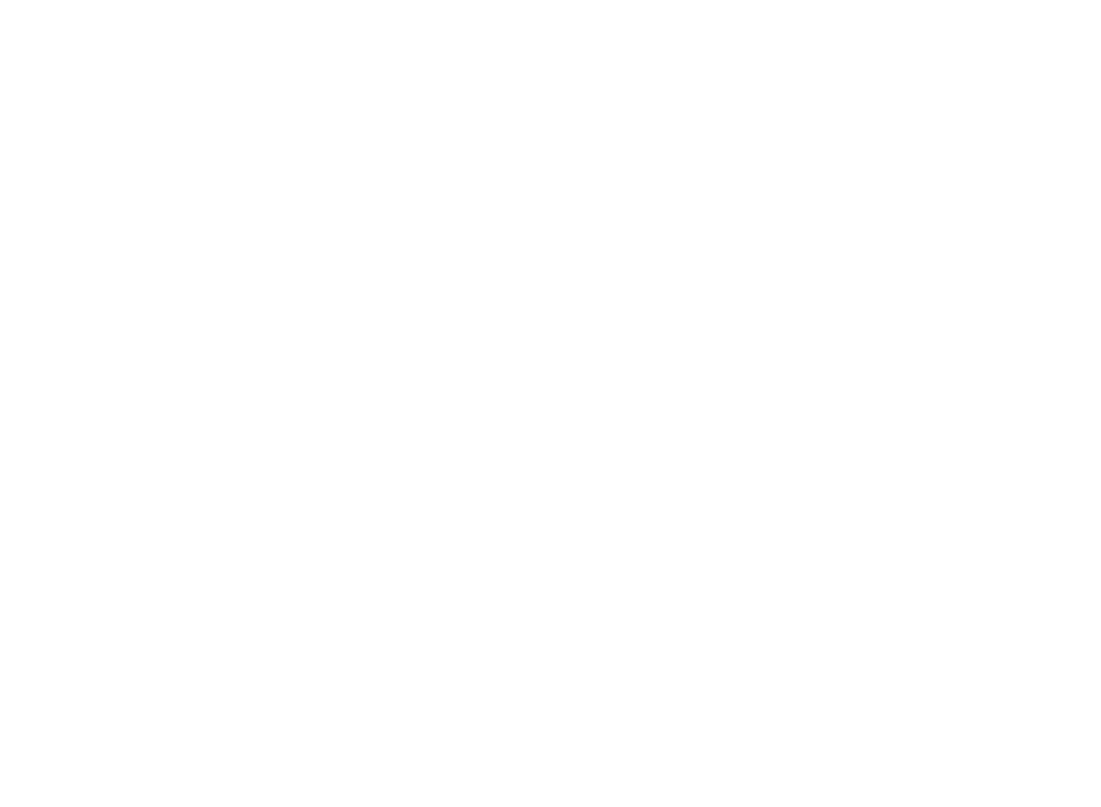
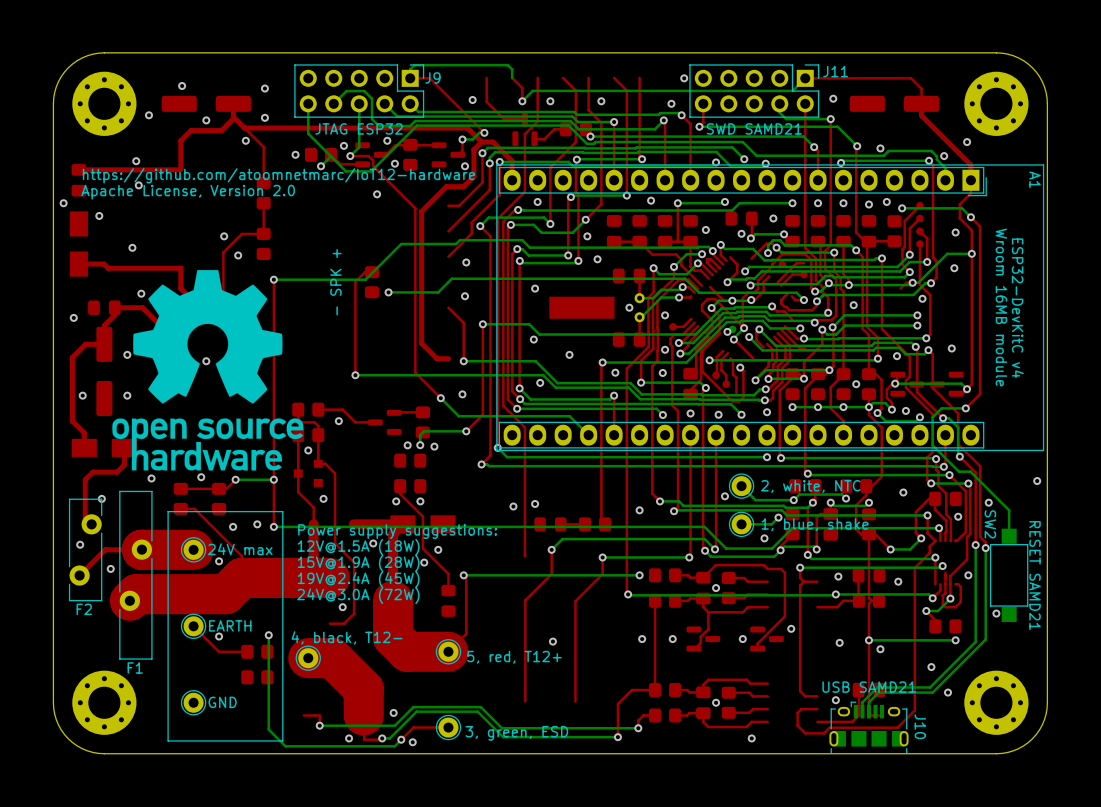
board edge: none -> (996, 52) (104, 52) (87, 55) (72, 63) (58, 81) (53, 103) (53, 702) (56, 719) (64, 734) (82, 748) (104, 753) (996, 753) (1013, 750) (1028, 742) (1042, 724) (1047, 702) (1047, 103) (1042, 81) (1032, 67) (1013, 55) (996, 52)
top track: none -> (486, 77) (486, 101) (503, 119) (524, 119)
top track: none -> (512, 77) (522, 88) (522, 101)
bottom track: none -> (512, 77) (512, 69) (507, 65) (414, 65) (410, 69) (410, 78)
top track: none -> (537, 77) (537, 121) (524, 134) (524, 191) (497, 218) (497, 447)
top track: none -> (563, 77) (575, 90) (575, 142) (550, 167) (550, 223)
top track: none -> (588, 77) (588, 110) (601, 122) (601, 204) (585, 219)
top track: none -> (614, 77) (626, 90) (626, 195)
top track: none -> (639, 77) (639, 156) (642, 159)
top track: none -> (410, 78) (429, 78) (484, 132)
via: none -> (684, 78)
top track: none -> (805, 78) (911, 78) (921, 88) (921, 115) (970, 164) (970, 193) (959, 204) (959, 218) (971, 230) (971, 384) (962, 393) (956, 393)
bottom track: none -> (805, 78) (792, 90) (532, 90) (522, 101)
via: none -> (182, 85)
via: none -> (264, 88)
J9: none -> (359, 91)
J11: none -> (754, 91)
via: none -> (833, 98)
via: none -> (472, 100)
via: none -> (522, 101)
via: none -> (550, 101)
via: none -> (601, 101)
part: none -> (104, 103)
part: none -> (206, 103)
top track: none -> (233, 103) (233, 118) (221, 130) (191, 130) (180, 140) (179, 169) (78, 169)
bottom track: none -> (308, 103) (308, 133) (345, 171) (371, 171) (417, 125) (568, 125) (587, 143) (595, 142) (742, 142) (756, 155) (883, 155) (888, 150) (931, 150) (945, 168) (945, 180)
bottom track: none -> (333, 103) (346, 91) (364, 91) (371, 98) (371, 119) (378, 126) (410, 126) (415, 121) (570, 121) (578, 129) (654, 129) (663, 120)
bottom track: none -> (359, 103) (359, 147) (350, 156)
bottom track: none -> (384, 103) (397, 116) (572, 116) (577, 122) (614, 122)
bottom track: none -> (410, 103) (418, 112) (574, 112) (577, 114) (679, 113) (681, 115)
via: none -> (671, 103)
top track: none -> (703, 103) (703, 122) (699, 126)
bottom track: none -> (779, 103) (779, 112) (786, 119) (830, 119)
top track: none -> (805, 103) (805, 247) (815, 258) (815, 280) (822, 287) (822, 292) (828, 297) (828, 312)
part: none -> (894, 103)
part: none -> (996, 103)
top track: none -> (240, 105) (234, 111) (234, 117) (263, 147) (263, 182)
via: none -> (148, 115)
top track: none -> (681, 115) (690, 124) (690, 180)
via: none -> (681, 115)
top track: none -> (233, 116) (244, 128) (467, 128) (481, 142)
via: none -> (264, 117)
top track: none -> (830, 119) (830, 245) (824, 251) (824, 268) (836, 279) (836, 315) (831, 320) (817, 320) (814, 322)
via: none -> (830, 119)
via: none -> (206, 120)
top track: none -> (663, 120) (665, 180)
via: none -> (663, 120)
top track: none -> (614, 122) (614, 180)
via: none -> (614, 122)
bottom track: none -> (699, 126) (837, 126) (857, 146)
via: none -> (699, 126)
text: none -> JTAG ESP32 (359, 128)
text: none -> SWD SAMD21 (754, 128)
part: none -> (524, 129)
top track: none -> (565, 129) (554, 129) (544, 139) (534, 139)
part: none -> (575, 129)
bottom track: none -> (484, 132) (479, 132) (472, 139) (462, 139)
via: none -> (484, 132)
bottom track: none -> (590, 136) (803, 136) (814, 147)
via: none -> (590, 136)
top track: none -> (462, 139) (462, 150) (458, 154)
via: none -> (462, 139)
via: none -> (245, 140)
via: none -> (387, 140)
top track: none -> (481, 142) (473, 149) (473, 176) (463, 186) (446, 186) (421, 211) (421, 343) (436, 358) (448, 358)
top track: none -> (481, 142) (493, 142) (512, 161) (512, 180)
via: none -> (967, 142)
via: none -> (343, 145)
top track: none -> (438, 145) (395, 145) (386, 154) (382, 154)
top track: none -> (857, 146) (856, 232) (865, 241) (868, 241)
via: none -> (857, 146)
top track: none -> (814, 147) (818, 150) (818, 180)
via: none -> (814, 147)
via: none -> (880, 148)
top track: none -> (482, 153) (482, 182) (459, 205) (448, 205)
bottom track: none -> (482, 153) (487, 147) (732, 147) (744, 159)
via: none -> (482, 153)
via: none -> (295, 154)
part: none -> (321, 154)
top track: none -> (331, 154) (340, 164) (361, 164)
part: none -> (371, 154)
part: none -> (410, 154)
part: none -> (448, 154)
bottom track: none -> (330, 156) (321, 166)
top track: none -> (350, 156) (368, 156) (373, 160) (373, 166) (415, 208) (415, 372) (440, 398)
via: none -> (350, 156)
via: none -> (944, 156)
top track: none -> (576, 159) (578, 260)
via: none -> (576, 159)
bottom track: none -> (642, 159) (576, 159)
via: none -> (642, 159)
via: none -> (744, 159)
top track: none -> (929, 160) (933, 164) (933, 257) (936, 260) (936, 277) (931, 283)
bottom track: none -> (929, 160) (843, 160) (841, 162)
via: none -> (929, 160)
via: none -> (136, 161)
top track: none -> (499, 161) (499, 194) (471, 222) (471, 233) (448, 256)
bottom track: none -> (499, 161) (568, 161) (573, 166) (712, 166) (716, 162)
via: none -> (499, 161)
via: none -> (716, 162)
via: none -> (841, 162)
via: none -> (394, 163)
top track: none -> (489, 163) (489, 189) (448, 231)
bottom track: none -> (489, 163) (489, 157) (495, 152) (716, 151) (730, 166) (762, 166) (765, 163)
via: none -> (489, 163)
via: none -> (765, 163)
via: none -> (321, 166)
via: none -> (465, 166)
text: none -> https://github.com/atoomnetmarc/IoT12-hardware (278, 175)
part: none -> (78, 180)
via: none -> (138, 185)
text: none -> Apache License, Version 2.0 (188, 192)
part: none -> (263, 193)
via: none -> (377, 194)
bottom track: none -> (626, 195) (570, 197)
via: none -> (626, 195)
top track: none -> (570, 197) (568, 199) (568, 255)
via: none -> (570, 197)
via: none -> (651, 200)
via: none -> (537, 201)
bottom track: none -> (724, 201) (677, 203)
via: none -> (724, 201)
via: none -> (886, 201)
via: none -> (63, 203)
top track: none -> (263, 203) (263, 233) (241, 233) (223, 252) (223, 326)
top track: none -> (677, 203) (678, 241)
via: none -> (677, 203)
bottom track: none -> (792, 203) (739, 203) (732, 210) (518, 209)
via: none -> (792, 203)
via: none -> (818, 203)
via: none -> (843, 203)
via: none -> (868, 204)
top track: none -> (919, 205) (904, 220) (902, 264) (909, 272)
part: none -> (919, 205)
bottom track: none -> (902, 208) (962, 208) (970, 217)
via: none -> (902, 208)
top track: none -> (518, 209) (515, 209) (503, 221) (503, 405) (524, 427) (525, 556)
via: none -> (518, 209)
via: none -> (99, 215)
top track: none -> (970, 217) (980, 226) (980, 394) (965, 408)
via: none -> (970, 217)
part: none -> (741, 218)
top track: none -> (751, 218) (750, 238)
via: none -> (773, 218)
top track: none -> (919, 218) (909, 228) (909, 254)
part: none -> (919, 218)
bottom track: none -> (585, 219) (572, 232) (541, 232) (533, 224) (510, 224)
via: none -> (585, 219)
bottom track: none -> (550, 223) (544, 217) (488, 217) (480, 226)
via: none -> (550, 223)
top track: none -> (510, 224) (507, 227) (507, 399) (517, 408)
via: none -> (510, 224)
top track: none -> (480, 226) (490, 236) (490, 455) (481, 464)
via: none -> (480, 226)
via: none -> (705, 229)
part: none -> (614, 231)
part: none -> (639, 231)
part: none -> (665, 231)
part: none -> (690, 231)
part: none -> (792, 231)
part: none -> (818, 231)
part: none -> (843, 231)
part: none -> (868, 231)
part: none -> (894, 231)
top track: none -> (919, 231) (927, 238) (927, 262)
part: none -> (919, 231)
via: none -> (955, 232)
via: none -> (741, 233)
bottom track: none -> (784, 234) (755, 234) (750, 238)
via: none -> (784, 234)
via: none -> (224, 236)
via: none -> (587, 236)
via: none -> (750, 238)
top track: none -> (614, 241) (639, 241) (652, 254) (676, 254) (681, 259) (681, 265) (701, 285)
top track: none -> (665, 241) (690, 241) (690, 266) (694, 270) (700, 270) (708, 278)
top track: none -> (818, 241) (820, 244) (820, 274) (828, 283)
top track: none -> (843, 241) (843, 274) (848, 279) (848, 285)
top track: none -> (894, 241) (869, 241) (867, 243) (867, 326) (877, 337) (877, 358)
part: none -> (78, 244)
part: none -> (263, 244)
top track: none -> (720, 244) (720, 255) (726, 260)
bottom track: none -> (720, 244) (724, 248) (753, 248) (764, 260) (881, 258)
via: none -> (720, 244)
top track: none -> (919, 244) (919, 284) (930, 295) (930, 334) (926, 338)
part: none -> (919, 244)
via: none -> (132, 247)
top track: none -> (776, 247) (772, 243) (766, 243) (751, 258)
bottom track: none -> (776, 247) (781, 252) (834, 252)
via: none -> (776, 247)
top track: none -> (517, 249) (512, 253) (512, 391) (520, 399)
bottom track: none -> (517, 249) (522, 249) (528, 255) (568, 255)
via: none -> (517, 249)
top track: none -> (856, 250) (862, 256) (862, 328) (868, 335) (868, 374) (876, 374) (881, 379) (881, 409) (877, 413)
bottom track: none -> (856, 250) (851, 245) (784, 245) (780, 240) (773, 240) (768, 245) (768, 253)
via: none -> (856, 250)
top track: none -> (712, 251) (712, 254) (723, 264)
bottom track: none -> (712, 251) (708, 246) (529, 247) (522, 240) (459, 240) (456, 244) (401, 244) (365, 279) (273, 279)
via: none -> (712, 251)
top track: none -> (834, 252) (834, 271) (840, 277) (840, 288) (843, 291) (843, 374) (830, 387) (830, 408) (843, 421) (843, 435)
via: none -> (834, 252)
via: none -> (768, 253)
bottom track: none -> (971, 253) (947, 253) (918, 282) (912, 282) (910, 285) (830, 285) (828, 283) (820, 291) (815, 291)
via: none -> (971, 253)
bottom track: none -> (702, 254) (686, 254) (674, 266)
via: none -> (702, 254)
bottom track: none -> (909, 254) (897, 266) (749, 266) (745, 271)
via: none -> (909, 254)
via: none -> (238, 255)
via: none -> (568, 255)
top track: none -> (730, 257) (737, 264) (737, 272) (727, 282)
top track: none -> (881, 258) (881, 329) (909, 356) (909, 376) (905, 380) (905, 387) (932, 414) (932, 451) (927, 457) (927, 479) (931, 483)
via: none -> (881, 258)
via: none -> (597, 259)
top track: none -> (519, 260) (519, 388)
via: none -> (519, 260)
bottom track: none -> (578, 260) (576, 263) (521, 263) (519, 260)
via: none -> (578, 260)
via: none -> (466, 262)
bottom track: none -> (927, 262) (909, 262) (900, 271) (761, 271) (754, 278) (730, 279) (727, 282)
via: none -> (927, 262)
top track: none -> (697, 263) (700, 263) (712, 275)
bottom track: none -> (697, 263) (687, 274) (659, 274) (653, 268)
via: none -> (697, 263)
top track: none -> (803, 263) (796, 263) (777, 282)
top track: none -> (78, 264) (104, 264) (108, 268) (180, 268) (180, 288) (189, 297) (189, 326)
part: none -> (782, 264)
top track: none -> (674, 266) (674, 278) (652, 299) (653, 348) (641, 360) (641, 382)
via: none -> (674, 266)
top track: none -> (719, 267) (710, 259) (707, 259) (707, 262) (716, 271)
top track: none -> (653, 268) (653, 292) (648, 297) (648, 346) (626, 368) (628, 594)
via: none -> (653, 268)
via: none -> (954, 268)
drawing: none -> [112, 270, 304, 471]
via: none -> (745, 271)
top track: none -> (371, 272) (364, 272) (355, 281) (355, 375)
bottom track: none -> (909, 272) (904, 277) (825, 275) (817, 284) (750, 285)
via: none -> (909, 272)
top track: none -> (803, 274) (792, 274) (781, 285)
part: none -> (803, 274)
part: none -> (629, 275)
top track: none -> (639, 275) (639, 298)
top track: none -> (769, 276) (763, 282) (763, 291) (754, 300) (751, 300)
top track: none -> (273, 279) (273, 526)
via: none -> (273, 279)
text: none -> - SPK + (335, 282)
part: none -> (371, 282)
via: none -> (727, 282)
top track: none -> (912, 282) (906, 282) (900, 288)
via: none -> (912, 282)
via: none -> (828, 283)
bottom track: none -> (931, 283) (925, 283) (913, 294) (823, 294) (816, 301)
via: none -> (931, 283)
via: none -> (750, 285)
via: none -> (848, 285)
top track: none -> (682, 287) (689, 287) (694, 292)
bottom track: none -> (682, 287) (679, 289) (661, 289) (652, 298) (639, 298)
via: none -> (682, 287)
top track: none -> (710, 287) (723, 300) (732, 300)
via: none -> (535, 288)
top track: none -> (698, 289) (688, 279) (679, 279) (657, 301) (657, 361) (652, 366) (652, 493) (659, 501)
top track: none -> (815, 291) (811, 287) (811, 260) (805, 254) (782, 254) (757, 280) (757, 289) (754, 292) (748, 292) (742, 298) (742, 326)
via: none -> (815, 291)
bottom track: none -> (388, 292) (438, 292) (451, 278) (685, 278) (699, 292) (796, 292) (803, 300)
via: none -> (388, 292)
top track: none -> (788, 292) (781, 299) (781, 303) (789, 310) (812, 310) (816, 305) (816, 301)
via: none -> (141, 293)
via: none -> (465, 296)
top track: none -> (691, 296) (679, 297)
top track: none -> (791, 296) (795, 300) (803, 300)
bottom track: none -> (679, 297) (661, 297) (639, 317)
via: none -> (679, 297)
via: none -> (922, 298)
via: none -> (732, 300)
bottom track: none -> (751, 300) (718, 300) (711, 308)
via: none -> (751, 300)
via: none -> (803, 300)
via: none -> (816, 301)
via: none -> (853, 305)
top track: none -> (772, 306) (777, 311) (784, 311) (791, 319)
bottom track: none -> (772, 306) (721, 308) (695, 334) (539, 334) (529, 324) (482, 324)
via: none -> (772, 306)
part: none -> (104, 307)
top track: none -> (448, 307) (463, 323) (463, 361)
part: none -> (596, 307)
via: none -> (629, 307)
A1: none -> (770, 307)
text: none -> Wroom 16MB module (1001, 307)
text: none -> ESP32-DevKitC v4 (1017, 308)
top track: none -> (711, 308) (719, 315) (719, 333) (701, 351) (701, 379) (690, 390) (690, 394)
via: none -> (711, 308)
bottom track: none -> (828, 312) (825, 315) (769, 315) (766, 311) (723, 313) (693, 342) (678, 342)
via: none -> (828, 312)
via: none -> (665, 315)
bottom track: none -> (917, 315) (844, 315) (832, 327)
via: none -> (917, 315)
via: none -> (73, 317)
top track: none -> (639, 317) (639, 339)
top track: none -> (691, 319) (683, 326) (672, 326)
top track: none -> (694, 322) (682, 334) (674, 334) (670, 338) (672, 346) (672, 405) (678, 411) (678, 507) (674, 511)
bottom track: none -> (814, 322) (812, 320) (769, 320) (764, 316) (725, 317) (689, 353) (680, 353)
via: none -> (814, 322)
top track: none -> (482, 324) (482, 414) (466, 431)
via: none -> (482, 324)
bottom track: none -> (917, 325) (845, 325) (836, 334) (827, 334) (822, 329)
via: none -> (917, 325)
top track: none -> (172, 326) (161, 326) (142, 307) (114, 307) (114, 315) (104, 325) (104, 344) (85, 344) (72, 357) (72, 421) (84, 432) (84, 447)
part: none -> (672, 326)
top track: none -> (698, 326) (681, 342) (678, 342)
top track: none -> (784, 326) (797, 338) (803, 338)
top track: none -> (832, 327) (833, 366) (825, 374) (818, 374) (805, 388) (805, 471) (807, 473)
via: none -> (832, 327)
top track: none -> (744, 328) (715, 299) (707, 299) (702, 304) (702, 310) (712, 320) (712, 326) (705, 333)
bottom track: none -> (744, 328) (733, 339)
via: none -> (744, 328)
bottom track: none -> (800, 328) (770, 328) (762, 320) (726, 322) (686, 362) (602, 362)
via: none -> (800, 328)
top track: none -> (701, 329) (680, 353)
part: none -> (732, 329)
top track: none -> (759, 329) (756, 332) (756, 340) (763, 347)
bottom track: none -> (759, 329) (775, 345) (871, 345) (874, 342) (911, 342) (915, 346)
via: none -> (759, 329)
top track: none -> (781, 329) (800, 348) (805, 348)
top track: none -> (822, 329) (822, 344) (803, 362) (803, 378) (799, 374) (792, 374) (792, 378) (779, 390) (781, 458)
via: none -> (822, 329)
via: none -> (727, 331)
top track: none -> (719, 333) (702, 350) (702, 371) (732, 401) (739, 401) (743, 397) (743, 370) (740, 367)
top track: none -> (777, 333) (789, 345) (789, 360) (782, 368) (782, 381) (773, 391) (773, 397) (770, 400) (764, 400)
top track: none -> (708, 336) (696, 349) (696, 368) (690, 373)
top track: none -> (774, 336) (785, 348) (785, 358) (777, 366) (777, 380) (768, 389) (765, 389)
bottom track: none -> (749, 337) (762, 350) (873, 350) (876, 347) (899, 347) (905, 354) (924, 354) (928, 350)
via: none -> (749, 337)
via: none -> (803, 338)
bottom track: none -> (926, 338) (803, 338)
via: none -> (926, 338)
via: none -> (533, 339)
part: none -> (629, 339)
top track: none -> (733, 339) (752, 358)
via: none -> (733, 339)
top track: none -> (770, 340) (776, 346) (776, 360) (773, 364) (773, 370) (767, 376)
via: none -> (678, 342)
top track: none -> (767, 343) (772, 349) (772, 359) (755, 380)
top track: none -> (915, 346) (917, 392) (943, 418)
via: none -> (915, 346)
via: none -> (951, 348)
via: none -> (665, 349)
top track: none -> (928, 350) (932, 354) (932, 387) (958, 413) (958, 444) (980, 466) (980, 536) (985, 542) (985, 548)
via: none -> (928, 350)
top track: none -> (723, 351) (716, 357) (716, 375)
via: none -> (680, 353)
top track: none -> (727, 353) (721, 359) (721, 370) (726, 375) (726, 384)
via: none -> (127, 354)
via: none -> (569, 354)
via: none -> (897, 356)
top track: none -> (730, 358) (732, 360) (732, 374) (736, 377) (736, 394)
bottom track: none -> (877, 358) (876, 360) (709, 360)
via: none -> (877, 358)
via: none -> (709, 360)
via: none -> (206, 361)
bottom track: none -> (463, 361) (535, 361) (557, 383) (630, 383) (641, 394) (754, 395) (760, 389) (765, 389)
via: none -> (463, 361)
top track: none -> (602, 362) (601, 520) (605, 524)
via: none -> (602, 362)
via: none -> (740, 367)
bottom track: none -> (829, 370) (765, 370) (755, 380)
via: none -> (829, 370)
part: none -> (104, 371)
via: none -> (615, 372)
via: none -> (662, 372)
top track: none -> (897, 374) (897, 381) (886, 389) (886, 397) (891, 402) (891, 409)
bottom track: none -> (355, 375) (543, 375) (555, 387) (628, 387) (640, 399) (764, 400)
via: none -> (355, 375)
part: none -> (716, 375)
via: none -> (768, 378)
bottom track: none -> (803, 378) (768, 378)
via: none -> (803, 378)
via: none -> (755, 380)
via: none -> (540, 382)
bottom track: none -> (641, 382) (700, 382) (705, 388)
via: none -> (641, 382)
bottom track: none -> (895, 383) (961, 383) (967, 389)
via: none -> (895, 383)
part: none -> (690, 384)
part: none -> (726, 384)
part: none -> (792, 384)
part: none -> (818, 384)
part: none -> (843, 384)
via: none -> (856, 384)
part: none -> (868, 384)
part: none -> (907, 384)
part: none -> (946, 384)
bottom track: none -> (519, 388) (530, 399) (610, 399) (614, 395)
via: none -> (519, 388)
top track: none -> (705, 388) (703, 390) (703, 548) (705, 550)
via: none -> (705, 388)
via: none -> (765, 389)
via: none -> (967, 389)
via: none -> (462, 394)
top track: none -> (868, 394) (868, 414) (881, 427) (881, 476) (872, 486) (866, 486) (866, 495) (856, 505) (856, 529) (861, 534) (875, 534) (890, 549)
via: none -> (82, 395)
via: none -> (127, 395)
top track: none -> (614, 395) (614, 435)
via: none -> (614, 395)
bottom track: none -> (440, 398) (458, 416) (569, 416) (588, 435)
via: none -> (440, 398)
bottom track: none -> (520, 399) (524, 403) (731, 404) (741, 414)
via: none -> (520, 399)
via: none -> (764, 400)
bottom track: none -> (792, 407) (868, 407) (872, 403) (885, 403) (891, 409)
via: none -> (792, 407)
via: none -> (818, 407)
via: none -> (843, 407)
via: none -> (868, 407)
bottom track: none -> (517, 408) (656, 408) (662, 415)
via: none -> (517, 408)
bottom track: none -> (965, 408) (941, 408) (932, 417) (932, 445) (959, 471) (970, 471) (1009, 510) (1009, 536)
via: none -> (965, 408)
top track: none -> (298, 409) (298, 418) (301, 422) (314, 422) (318, 426) (318, 463) (325, 463) (335, 473) (335, 543) (354, 562) (354, 613) (344, 623) (329, 623)
part: none -> (308, 409)
top track: none -> (318, 409) (342, 409) (355, 422) (374, 422)
via: none -> (891, 409)
via: none -> (905, 410)
top track: none -> (422, 412) (394, 412)
via: none -> (767, 412)
via: none -> (690, 413)
bottom track: none -> (877, 413) (885, 421) (915, 421) (919, 417)
via: none -> (877, 413)
via: none -> (718, 414)
via: none -> (741, 414)
via: none -> (662, 415)
via: none -> (919, 417)
bottom track: none -> (943, 418) (948, 418) (958, 427) (958, 455) (959, 456)
via: none -> (943, 418)
via: none -> (338, 421)
part: none -> (384, 422)
part: none -> (422, 422)
bottom track: none -> (466, 431) (424, 431) (420, 435) (420, 445)
via: none -> (466, 431)
top track: none -> (298, 435) (298, 492) (313, 507) (313, 561) (329, 577) (241, 577)
part: none -> (308, 435)
top track: none -> (690, 435) (689, 557)
top track: none -> (716, 435) (715, 549)
top track: none -> (945, 435) (943, 466)
via: none -> (407, 445)
via: none -> (420, 445)
via: none -> (434, 446)
part: none -> (104, 447)
top track: none -> (124, 447) (124, 464) (117, 472) (92, 472) (85, 479) (85, 517) (91, 524)
bottom track: none -> (497, 447) (507, 457) (767, 457)
via: none -> (497, 447)
via: none -> (308, 450)
top track: none -> (959, 456) (975, 472) (975, 545)
via: none -> (959, 456)
via: none -> (767, 457)
bottom track: none -> (781, 458) (936, 459)
via: none -> (781, 458)
top track: none -> (936, 459) (938, 485) (946, 493) (946, 514) (950, 518) (950, 541)
via: none -> (936, 459)
part: none -> (410, 460)
bottom track: none -> (481, 464) (488, 466) (943, 466)
via: none -> (481, 464)
via: none -> (943, 466)
part: none -> (308, 473)
bottom track: none -> (807, 473) (949, 475)
via: none -> (807, 473)
top track: none -> (949, 475) (965, 491) (965, 532) (955, 541)
via: none -> (949, 475)
via: none -> (201, 477)
via: none -> (151, 478)
top track: none -> (235, 479) (226, 488) (180, 488)
via: none -> (235, 479)
bottom track: none -> (273, 479) (235, 479)
via: none -> (273, 479)
via: none -> (1037, 481)
bottom track: none -> (931, 483) (968, 483)
via: none -> (931, 483)
top track: none -> (968, 483) (970, 485) (970, 533) (967, 537) (967, 559) (950, 576) (950, 598)
via: none -> (968, 483)
top track: none -> (400, 486) (400, 493) (422, 516) (422, 548) (448, 574) (448, 590)
part: none -> (410, 486)
bottom track: none -> (741, 486) (755, 500) (793, 500) (799, 494) (842, 494) (846, 498)
part: none -> (741, 486)
text: none -> 2, white, NTC (810, 486)
part: none -> (805, 486)
top track: none -> (815, 486) (815, 500) (807, 507) (807, 554)
part: none -> (856, 486)
via: none -> (903, 492)
via: none -> (724, 496)
via: none -> (101, 498)
part: none -> (180, 498)
part: none -> (219, 498)
via: none -> (323, 498)
via: none -> (846, 498)
part: none -> (945, 498)
via: none -> (793, 500)
via: none -> (396, 501)
via: none -> (420, 501)
bottom track: none -> (659, 501) (679, 501) (683, 505) (783, 505) (785, 507) (807, 507) (812, 502)
via: none -> (659, 501)
via: none -> (812, 502)
top track: none -> (830, 502) (830, 513) (820, 513) (816, 517) (816, 549)
bottom track: none -> (830, 502) (833, 505) (865, 505) (869, 502)
via: none -> (830, 502)
via: none -> (869, 502)
via: none -> (988, 502)
via: none -> (535, 503)
via: none -> (513, 506)
top track: none -> (180, 508) (194, 508) (241, 556) (241, 577)
via: none -> (639, 510)
line: none -> (282, 511) (282, 740) (168, 740) (168, 511) (282, 511)
bottom track: none -> (674, 511) (781, 510) (787, 515) (927, 515)
via: none -> (674, 511)
top track: none -> (927, 515) (927, 533) (935, 541) (929, 546) (929, 552) (914, 567) (914, 710) (897, 727) (829, 727) (824, 733) (805, 733) (797, 725) (797, 712) (801, 709) (817, 709)
via: none -> (927, 515)
via: none -> (958, 516)
bottom track: none -> (778, 517) (771, 524) (741, 524)
via: none -> (778, 517)
via: none -> (257, 524)
top track: none -> (353, 524) (402, 524) (393, 534) (393, 637) (407, 651) (448, 651) (466, 633) (466, 577) (463, 575)
part: none -> (422, 524)
part: none -> (550, 524)
top track: none -> (584, 524) (560, 524)
part: none -> (595, 524)
part: none -> (741, 524)
part: none -> (792, 524)
text: none -> 1, blue, shake (815, 524)
part: none -> (830, 524)
part: none -> (868, 524)
via: none -> (233, 526)
bottom track: none -> (273, 526) (704, 526) (726, 548) (772, 548) (792, 528) (939, 528)
via: none -> (273, 526)
top track: none -> (939, 528) (940, 541)
via: none -> (939, 528)
text: none -> Power supply suggestions: (397, 531)
top track: none -> (792, 534) (780, 546) (780, 550)
top track: none -> (868, 534) (868, 598) (871, 600)
via: none -> (764, 538)
top track: none -> (921, 538) (915, 533) (915, 512) (929, 498) (935, 498) (935, 509) (946, 520) (945, 541)
bottom track: none -> (921, 538) (910, 549) (890, 549)
via: none -> (921, 538)
via: none -> (373, 543)
via: none -> (80, 544)
bottom track: none -> (975, 545) (975, 641) (930, 687) (877, 687) (862, 702) (862, 711)
via: none -> (975, 545)
text: none -> 12V@1.5A (18W) (358, 547)
bottom track: none -> (985, 548) (985, 639) (932, 692) (878, 692) (868, 702) (868, 711)
via: none -> (985, 548)
F2: none -> (85, 549)
top track: none -> (129, 549) (105, 549) (79, 575)
top track: none -> (141, 549) (193, 549)
part: none -> (193, 549)
text: none -> 24V max (240, 549)
via: none -> (438, 549)
top track: none -> (551, 549) (551, 574) (525, 600) (525, 701)
via: none -> (551, 549)
bottom track: none -> (715, 549) (704, 539) (562, 539) (551, 549)
via: none -> (715, 549)
bottom track: none -> (816, 549) (813, 546) (784, 546) (774, 556) (711, 556) (705, 550)
via: none -> (816, 549)
via: none -> (890, 549)
via: none -> (705, 550)
via: none -> (780, 550)
bottom track: none -> (807, 554) (811, 558) (935, 557)
via: none -> (807, 554)
top track: none -> (602, 557) (602, 574) (575, 601) (575, 701)
via: none -> (602, 557)
bottom track: none -> (689, 557) (602, 557)
via: none -> (689, 557)
top track: none -> (935, 557) (935, 584)
via: none -> (935, 557)
via: none -> (219, 561)
via: none -> (424, 562)
text: none -> 15V@1.9A (28W) (358, 563)
bottom track: none -> (942, 566) (941, 567) (800, 567)
via: none -> (942, 566)
top track: none -> (800, 567) (800, 577) (803, 581)
via: none -> (800, 567)
via: none -> (110, 568)
top track: none -> (945, 572) (945, 593) (942, 595) (942, 604) (945, 607) (955, 607) (960, 602) (960, 586) (955, 584)
F1: none -> (135, 575)
via: none -> (463, 575)
bottom track: none -> (639, 575) (463, 575)
via: none -> (639, 575)
part: none -> (665, 575)
top track: none -> (675, 575) (703, 577) (715, 565) (763, 565) (767, 568) (781, 568) (784, 572) (784, 616) (757, 643) (757, 648)
top track: none -> (858, 575) (858, 600) (843, 600) (837, 607) (817, 607)
part: none -> (868, 575)
via: none -> (968, 575)
SW2: none -> (1009, 575)
text: none -> RESET SAMD21 (1035, 575)
via: none -> (838, 576)
top track: none -> (241, 577) (225, 594) (136, 594) (129, 600)
top track: none -> (728, 578) (744, 578) (747, 581) (767, 581)
text: none -> 19V@2.4A (45W) (358, 579)
top track: none -> (803, 581) (800, 585) (800, 691) (805, 696) (817, 696)
top track: none -> (817, 581) (803, 581)
via: none -> (898, 581)
top track: none -> (940, 584) (940, 590) (932, 598)
part: none -> (703, 588)
via: none -> (716, 588)
part: none -> (728, 588)
bottom track: none -> (628, 594) (928, 594) (932, 598)
via: none -> (628, 594)
top track: none -> (767, 594) (747, 594) (744, 598) (728, 598)
via: none -> (835, 594)
text: none -> 24V@3.0A (72W) (358, 595)
via: none -> (932, 598)
bottom track: none -> (950, 598) (938, 611) (926, 611)
via: none -> (950, 598)
part: none -> (448, 600)
top track: none -> (655, 600) (655, 690) (631, 690) (617, 704) (617, 737)
part: none -> (665, 600)
top track: none -> (675, 600) (703, 598) (703, 607) (708, 612)
part: none -> (868, 600)
top track: none -> (871, 600) (868, 603) (868, 712) (871, 715) (879, 715)
via: none -> (342, 607)
top track: none -> (767, 607) (747, 607) (742, 612) (708, 612)
top track: none -> (926, 611) (935, 620) (935, 626)
via: none -> (926, 611)
top track: none -> (708, 612) (708, 629) (700, 636) (700, 642) (693, 648)
via: none -> (996, 613)
text: none -> EARTH (230, 625)
top track: none -> (193, 626) (219, 651) (247, 651)
part: none -> (193, 626)
part: none -> (945, 626)
via: none -> (791, 628)
bottom track: none -> (268, 635) (268, 729) (285, 746) (394, 746) (401, 739)
via: none -> (268, 635)
via: none -> (219, 636)
text: none -> 4, black, T12- (347, 637)
via: none -> (642, 639)
via: none -> (672, 639)
part: none -> (703, 639)
via: none -> (742, 639)
part: none -> (767, 639)
via: none -> (868, 640)
bottom track: none -> (955, 640) (868, 640)
via: none -> (955, 640)
via: none -> (552, 641)
via: none -> (839, 642)
via: none -> (880, 649)
part: none -> (257, 651)
part: none -> (448, 651)
text: none -> 5, red, T12+ (514, 657)
top track: none -> (308, 658) (332, 658) (363, 689) (363, 715)
part: none -> (308, 658)
via: none -> (931, 667)
part: none -> (257, 677)
top track: none -> (767, 683) (750, 683) (746, 679) (708, 679) (703, 684) (703, 692) (675, 690)
text: none -> USB SAMD21 (869, 687)
part: none -> (665, 690)
top track: none -> (858, 690) (858, 715) (852, 721) (817, 721)
part: none -> (868, 690)
top track: none -> (728, 692) (749, 692) (753, 696) (767, 696)
via: none -> (947, 692)
via: none -> (835, 700)
part: none -> (104, 702)
part: none -> (193, 702)
text: none -> GND (222, 702)
part: none -> (703, 702)
via: none -> (716, 702)
part: none -> (728, 702)
part: none -> (996, 702)
top track: none -> (767, 709) (753, 709) (749, 712) (728, 712)
via: none -> (393, 712)
top track: none -> (314, 715) (303, 715)
part: none -> (317, 715)
top track: none -> (319, 715) (319, 725)
top track: none -> (655, 715) (643, 715) (638, 720) (638, 728)
part: none -> (665, 715)
top track: none -> (675, 715) (703, 713) (703, 721) (708, 726) (746, 726) (751, 721) (767, 721)
bottom track: none -> (319, 725) (394, 725) (413, 707) (480, 707) (501, 728) (638, 728)
via: none -> (319, 725)
top track: none -> (448, 727) (413, 727) (401, 739)
part: none -> (448, 727)
J10: none -> (868, 727)
via: none -> (638, 728)
text: none -> 3, green, ESD (516, 733)
part: none -> (364, 737)
bottom track: none -> (617, 737) (503, 737) (477, 711) (416, 711) (389, 738) (382, 738)
via: none -> (617, 737)
via: none -> (349, 738)
top track: none -> (382, 738) (364, 739)
via: none -> (382, 738)
via: none -> (751, 738)
via: none -> (401, 739)
via: none -> (412, 742)

